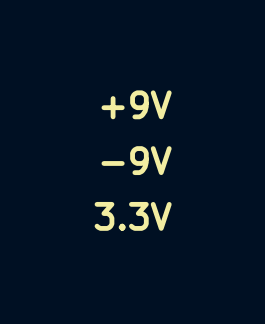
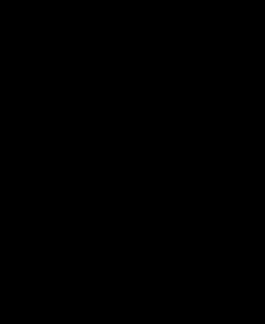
text: +9V (136, 104) -> none
text: -9V (136, 160) -> none
text: 3.3V (133, 216) -> none

